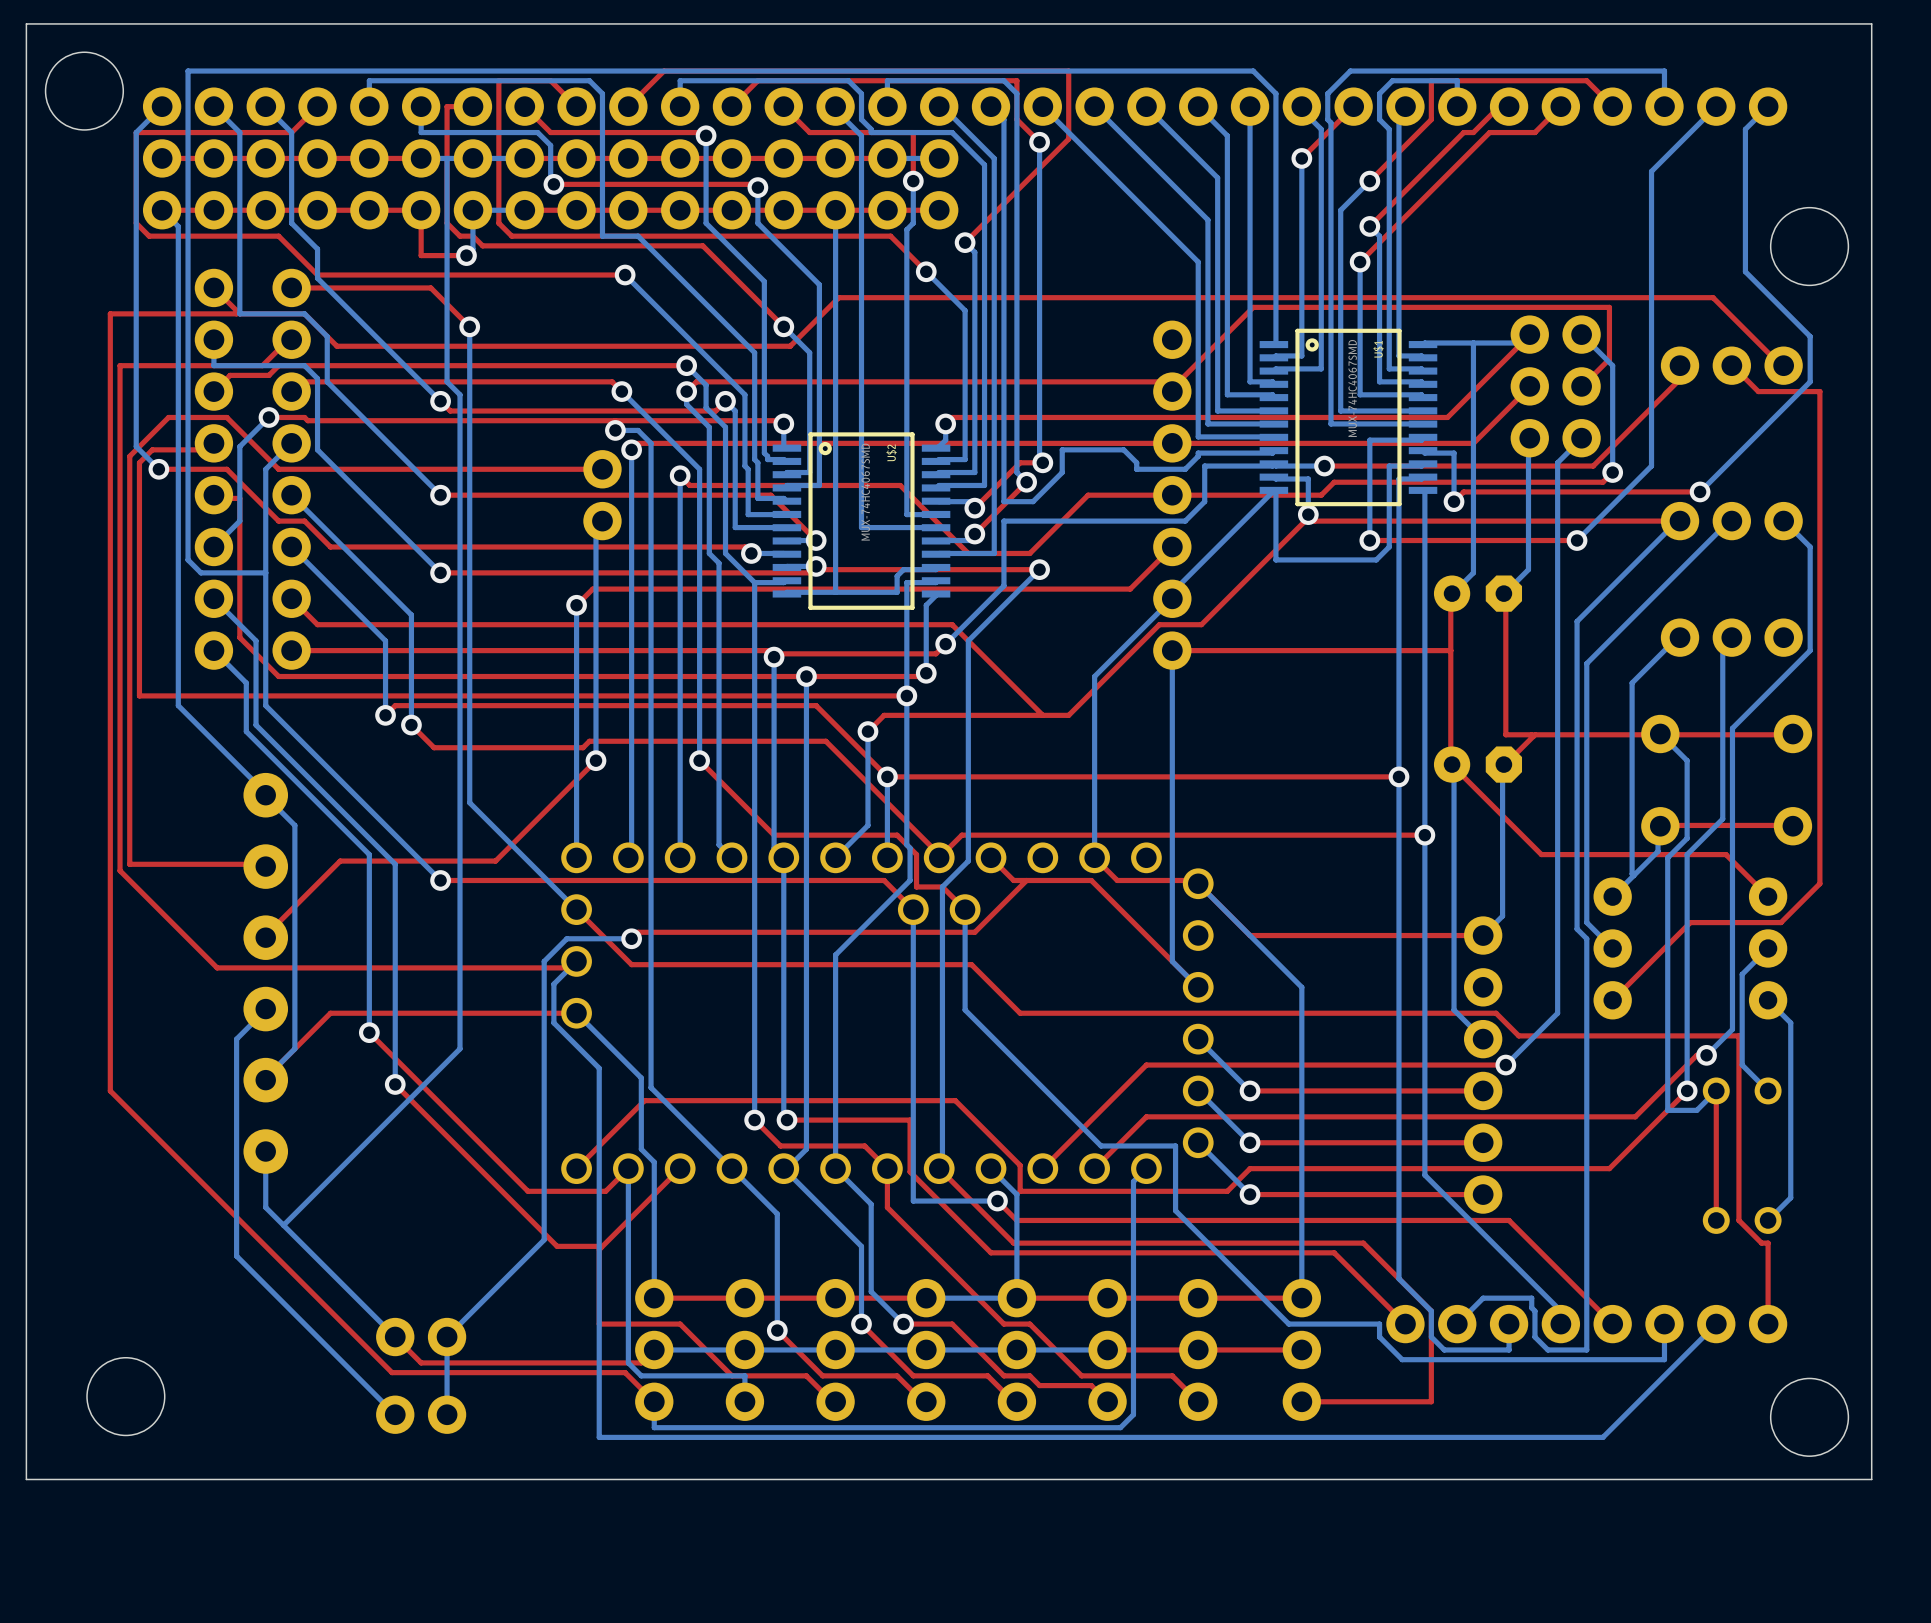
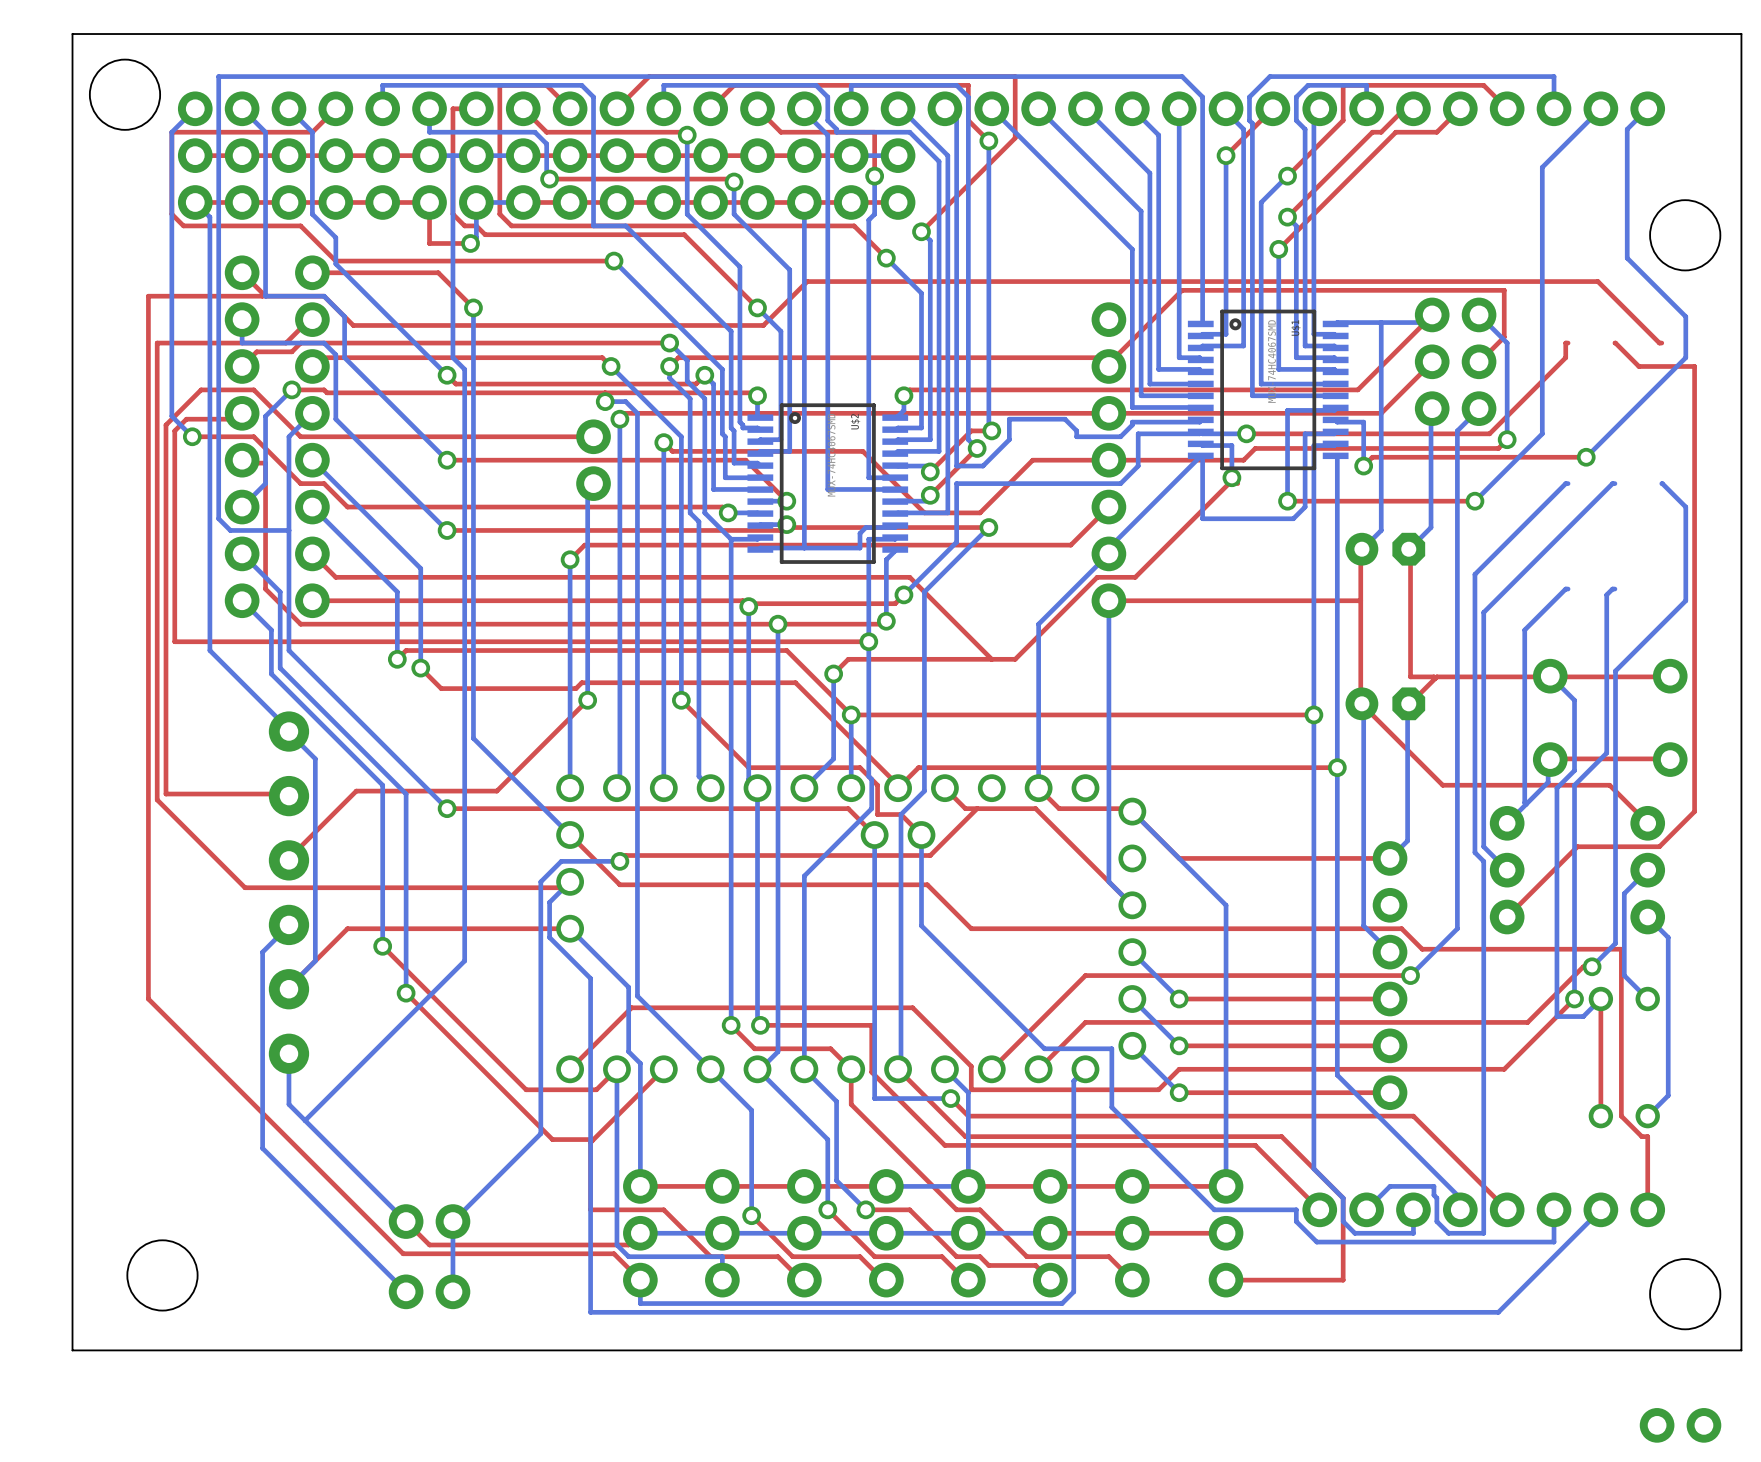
part: (1731, 365) -> none
top track: (1680, 521) (1314, 521) -> none
part: (1731, 521) -> none
part: (1731, 637) -> none
part: none -> (1680, 1425)

